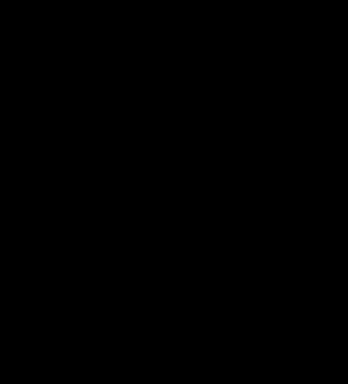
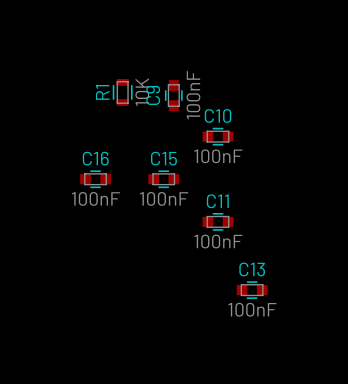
R1: none -> 10K (122, 92)
C9: none -> 100nF (173, 95)
C10: none -> 100nF (217, 136)
C16: none -> 100nF (95, 179)
C15: none -> 100nF (163, 179)
C11: none -> 100nF (217, 221)
C13: none -> 100nF (252, 290)

